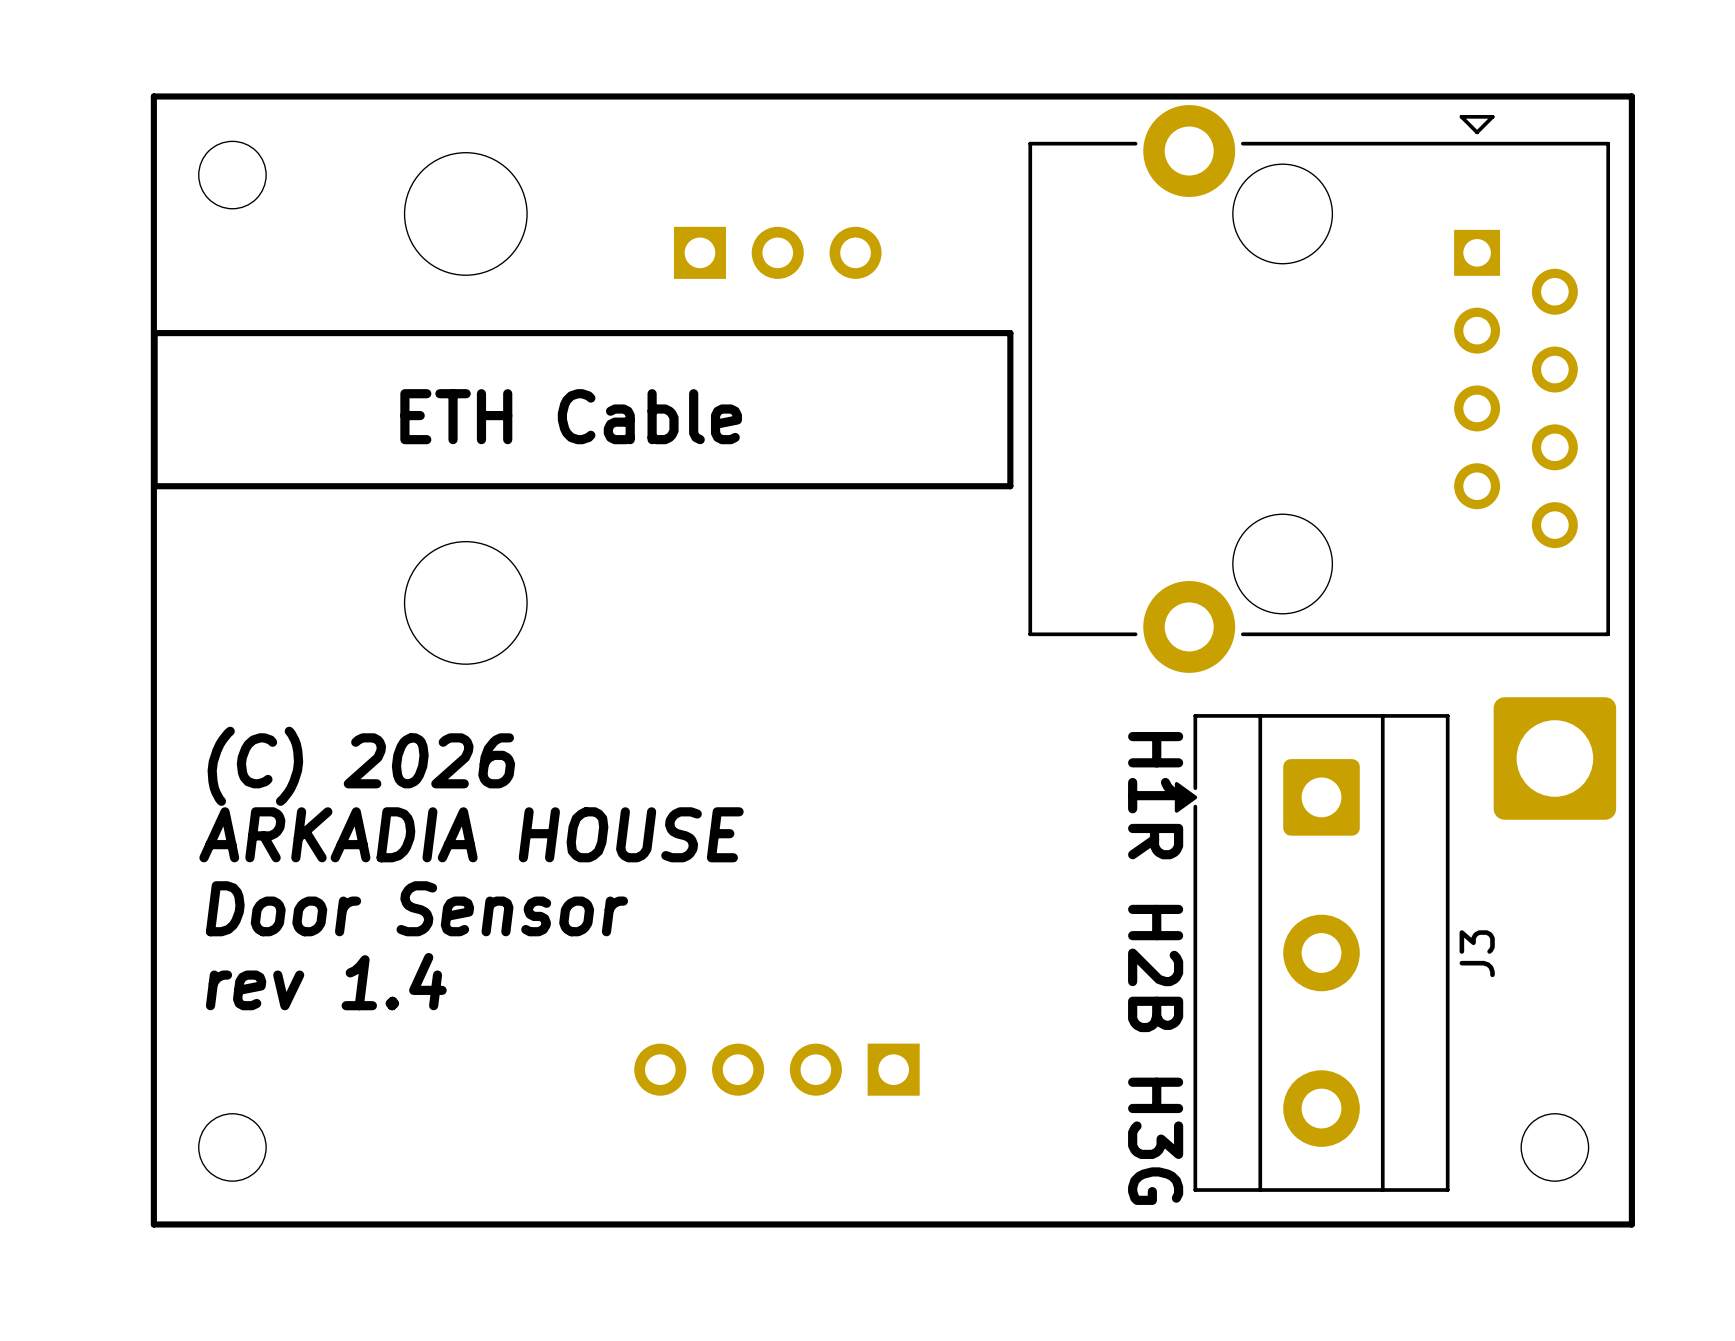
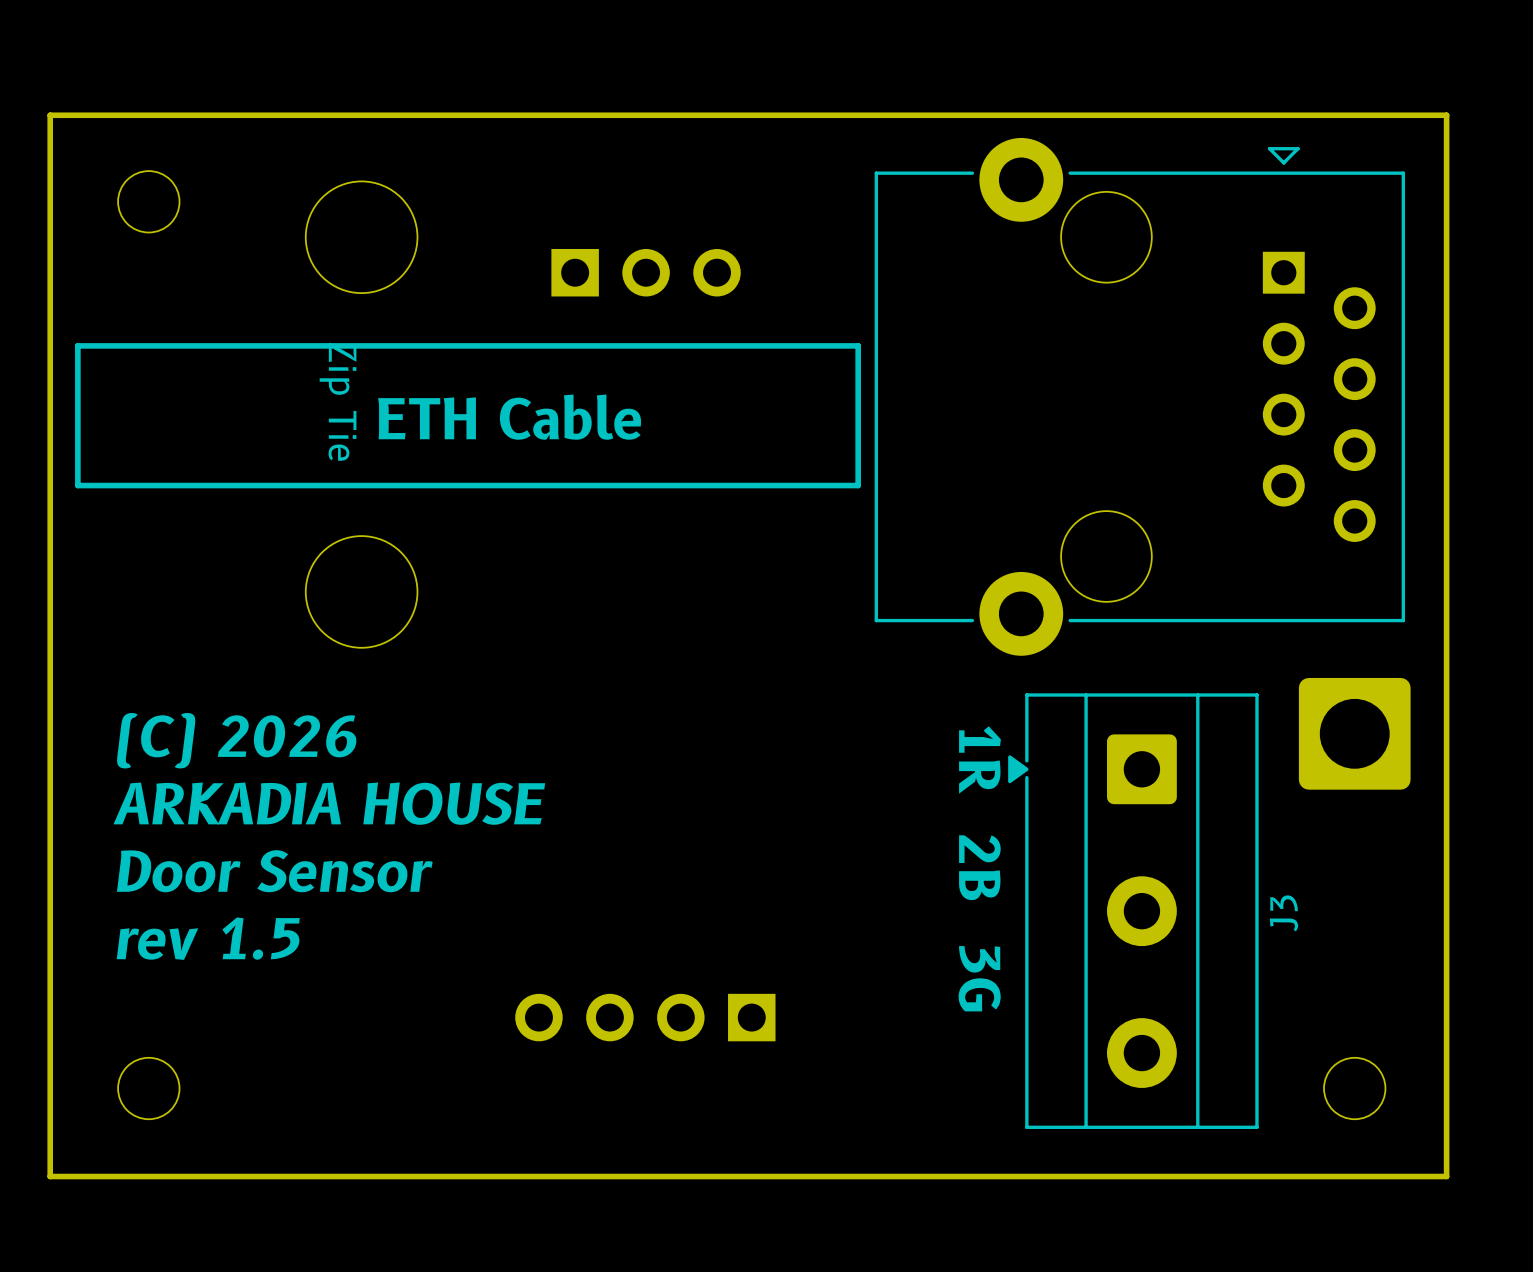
board edge: (153, 96) (1631, 96) (1631, 1224) (153, 1224) (153, 96) -> (50, 115) (50, 1176) (1446, 1176) (1446, 115) (50, 115)
text: none -> Zip Tie (338, 401)
text position: ETH Cable (571, 416) -> ETH Cable (509, 417)
text: H1R H2B H3G (1155, 968) -> 1R 2B 3G (979, 868)
text: rev 1.4 (326, 981) -> rev 1.5 (208, 938)

